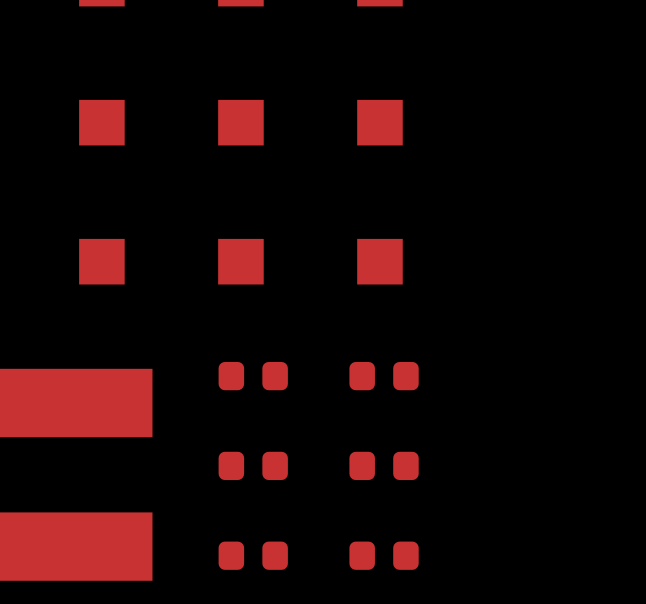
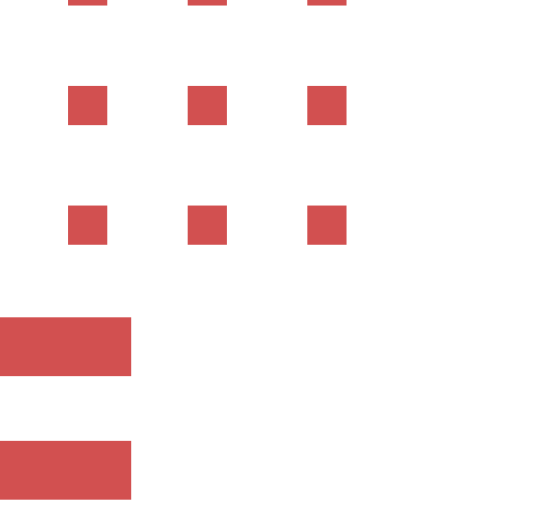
part: (253, 376) -> none
part: (384, 376) -> none
part: (253, 465) -> none
part: (384, 465) -> none
part: (253, 555) -> none
part: (384, 555) -> none

